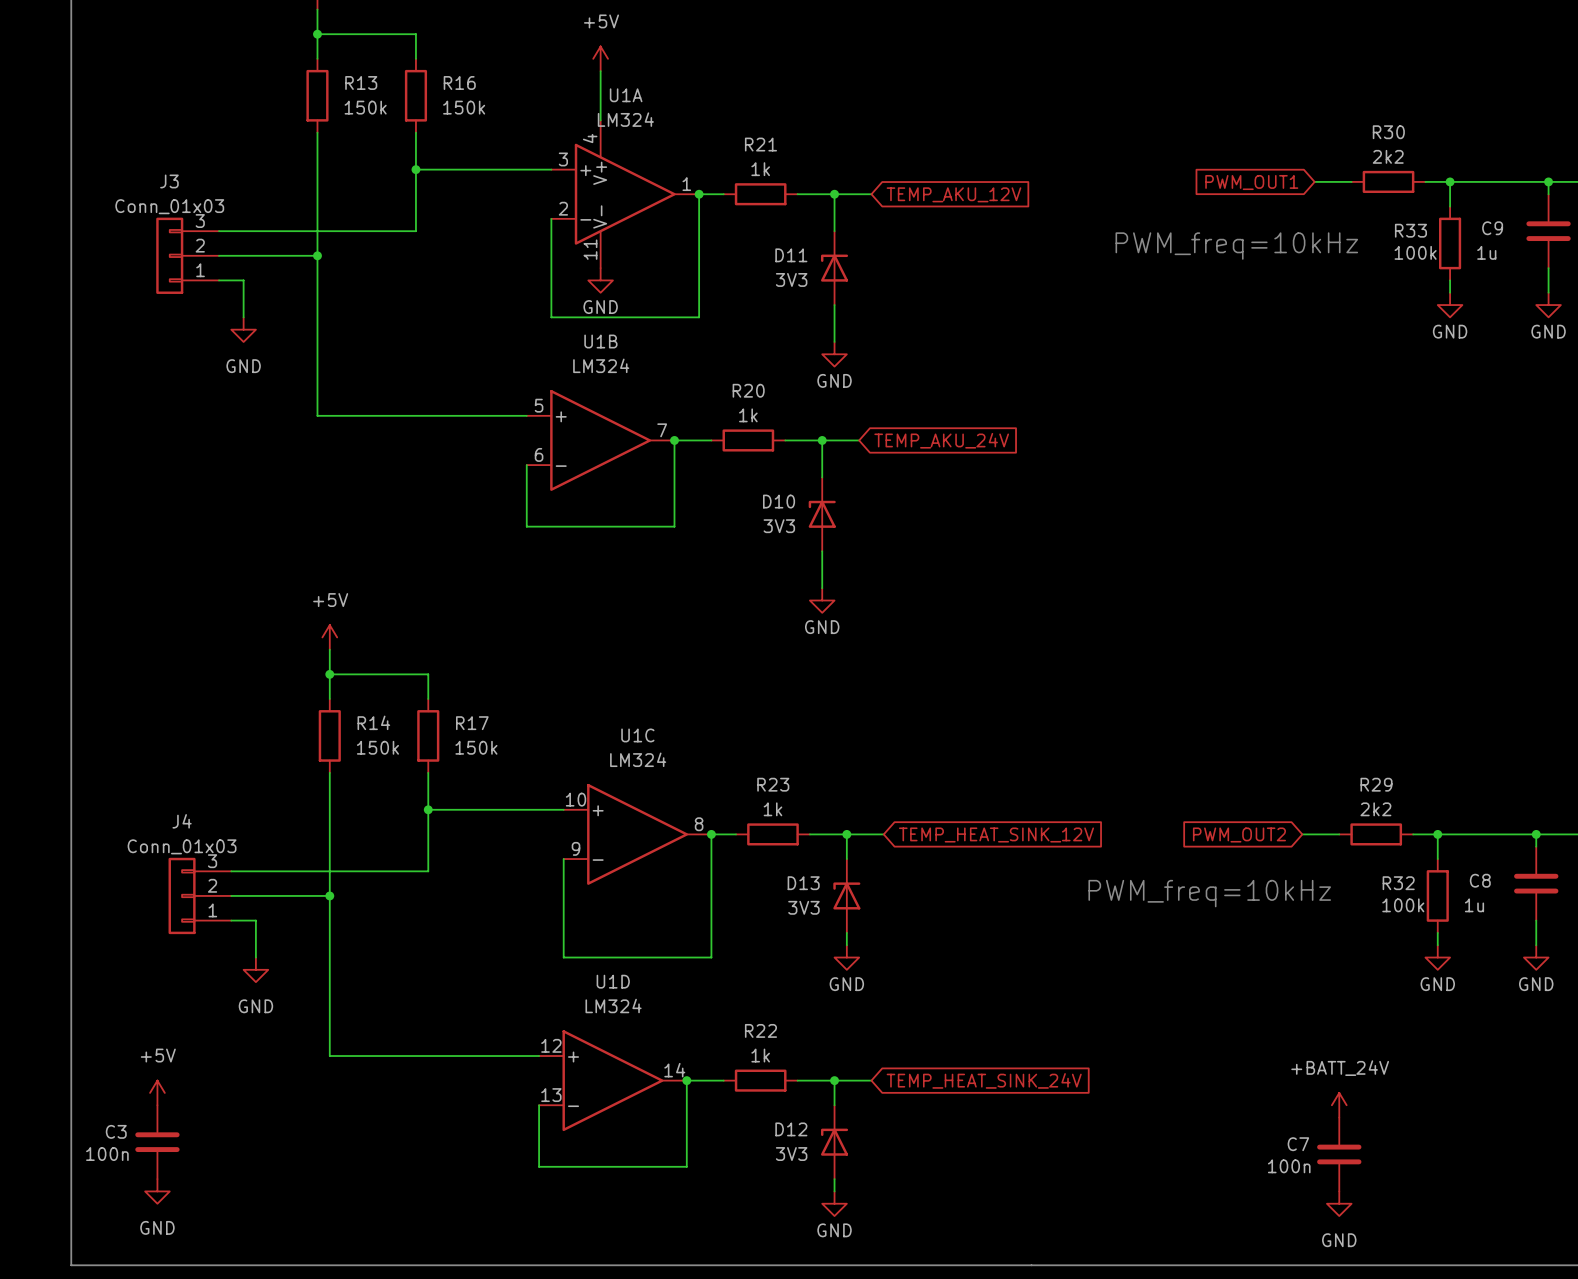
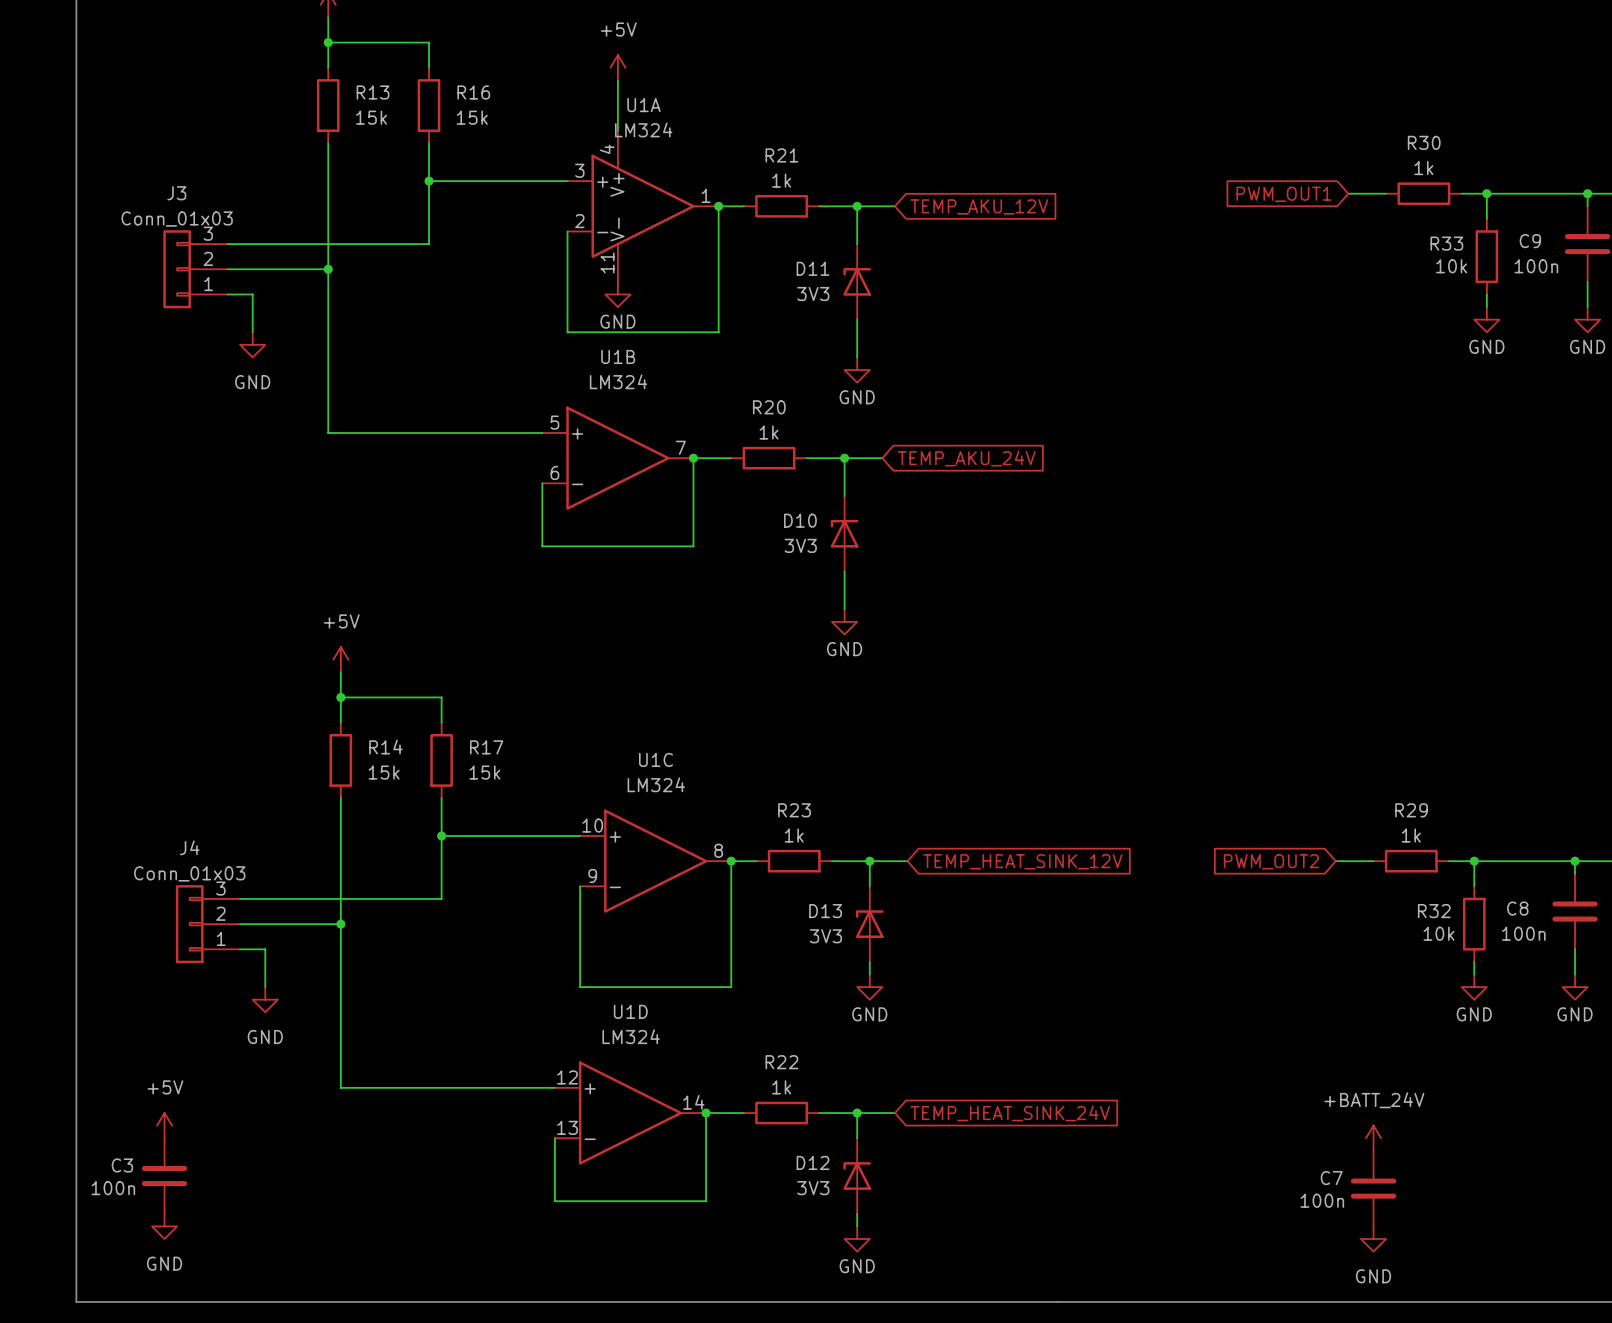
R13 value: 150k (365, 107) -> 15k (371, 117)
R16 value: 150k (464, 107) -> 15k (472, 117)
R30 value: 2k2 (1388, 156) -> 1k (1423, 168)
text: PWM_freq=10kHz (1236, 246) -> none
R33 value: 100k (1415, 252) -> 10k (1451, 266)
C9 value: 1u (1486, 252) -> 100n (1536, 266)
R14 value: 150k (377, 747) -> 15k (384, 772)
R17 value: 150k (476, 747) -> 15k (484, 772)
R29 value: 2k2 (1375, 809) -> 1k (1411, 835)
text: PWM_freq=10kHz (1209, 893) -> none
R32 value: 100k (1403, 905) -> 10k (1439, 933)
C8 value: 1u (1474, 905) -> 100n (1523, 933)

